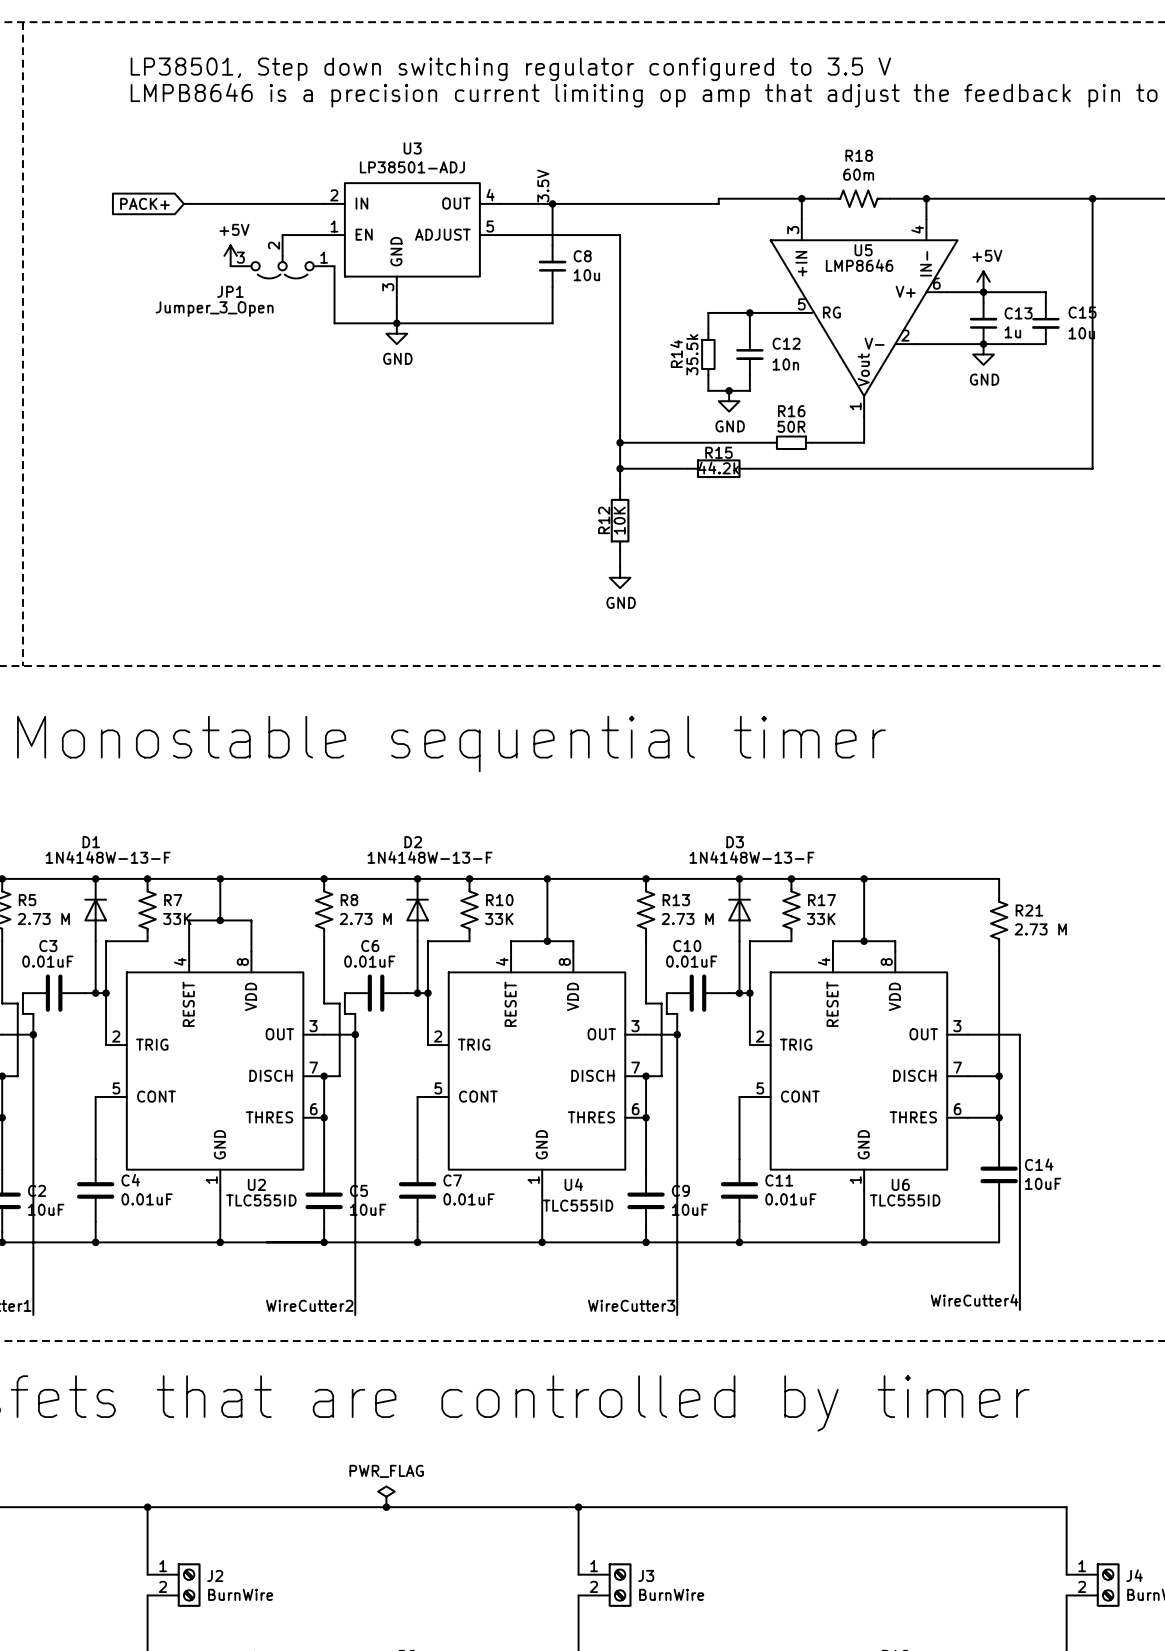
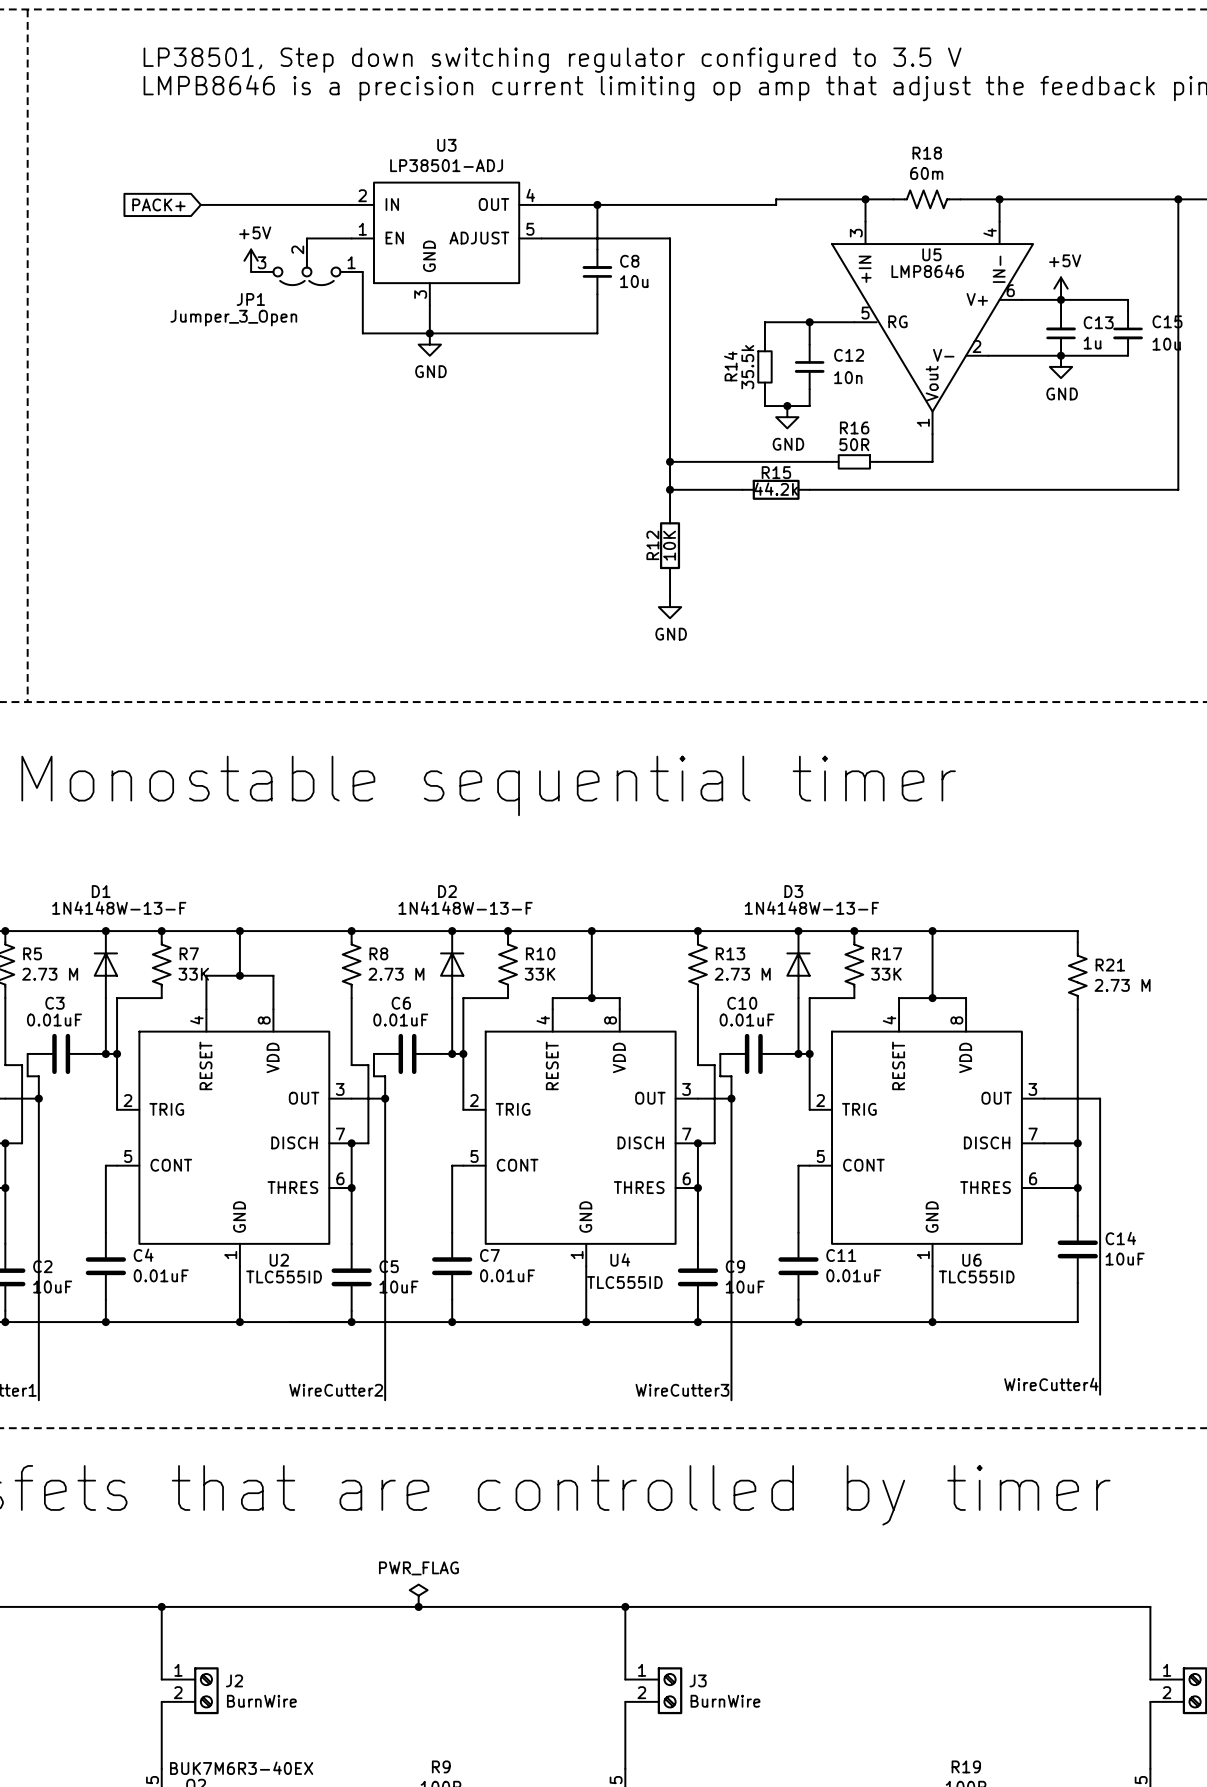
label: 3.5V (543, 186) -> none

